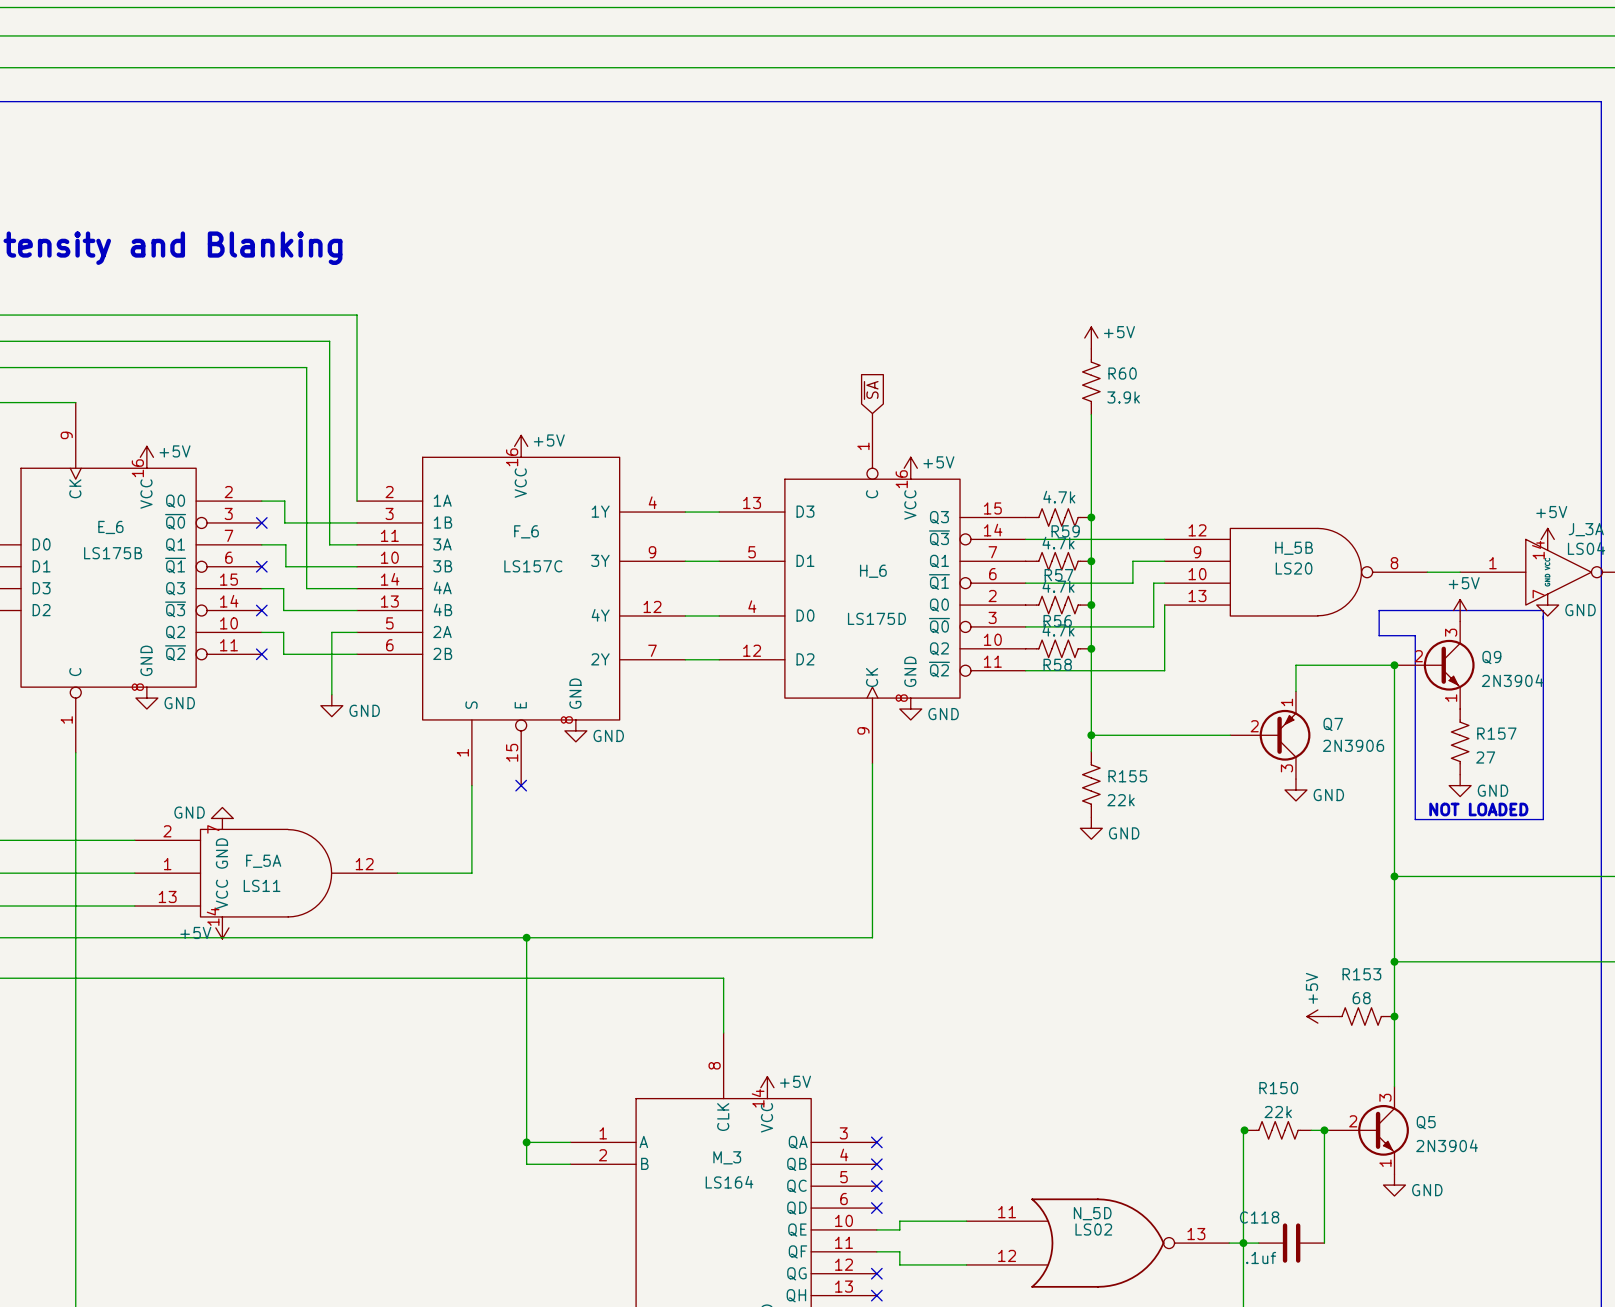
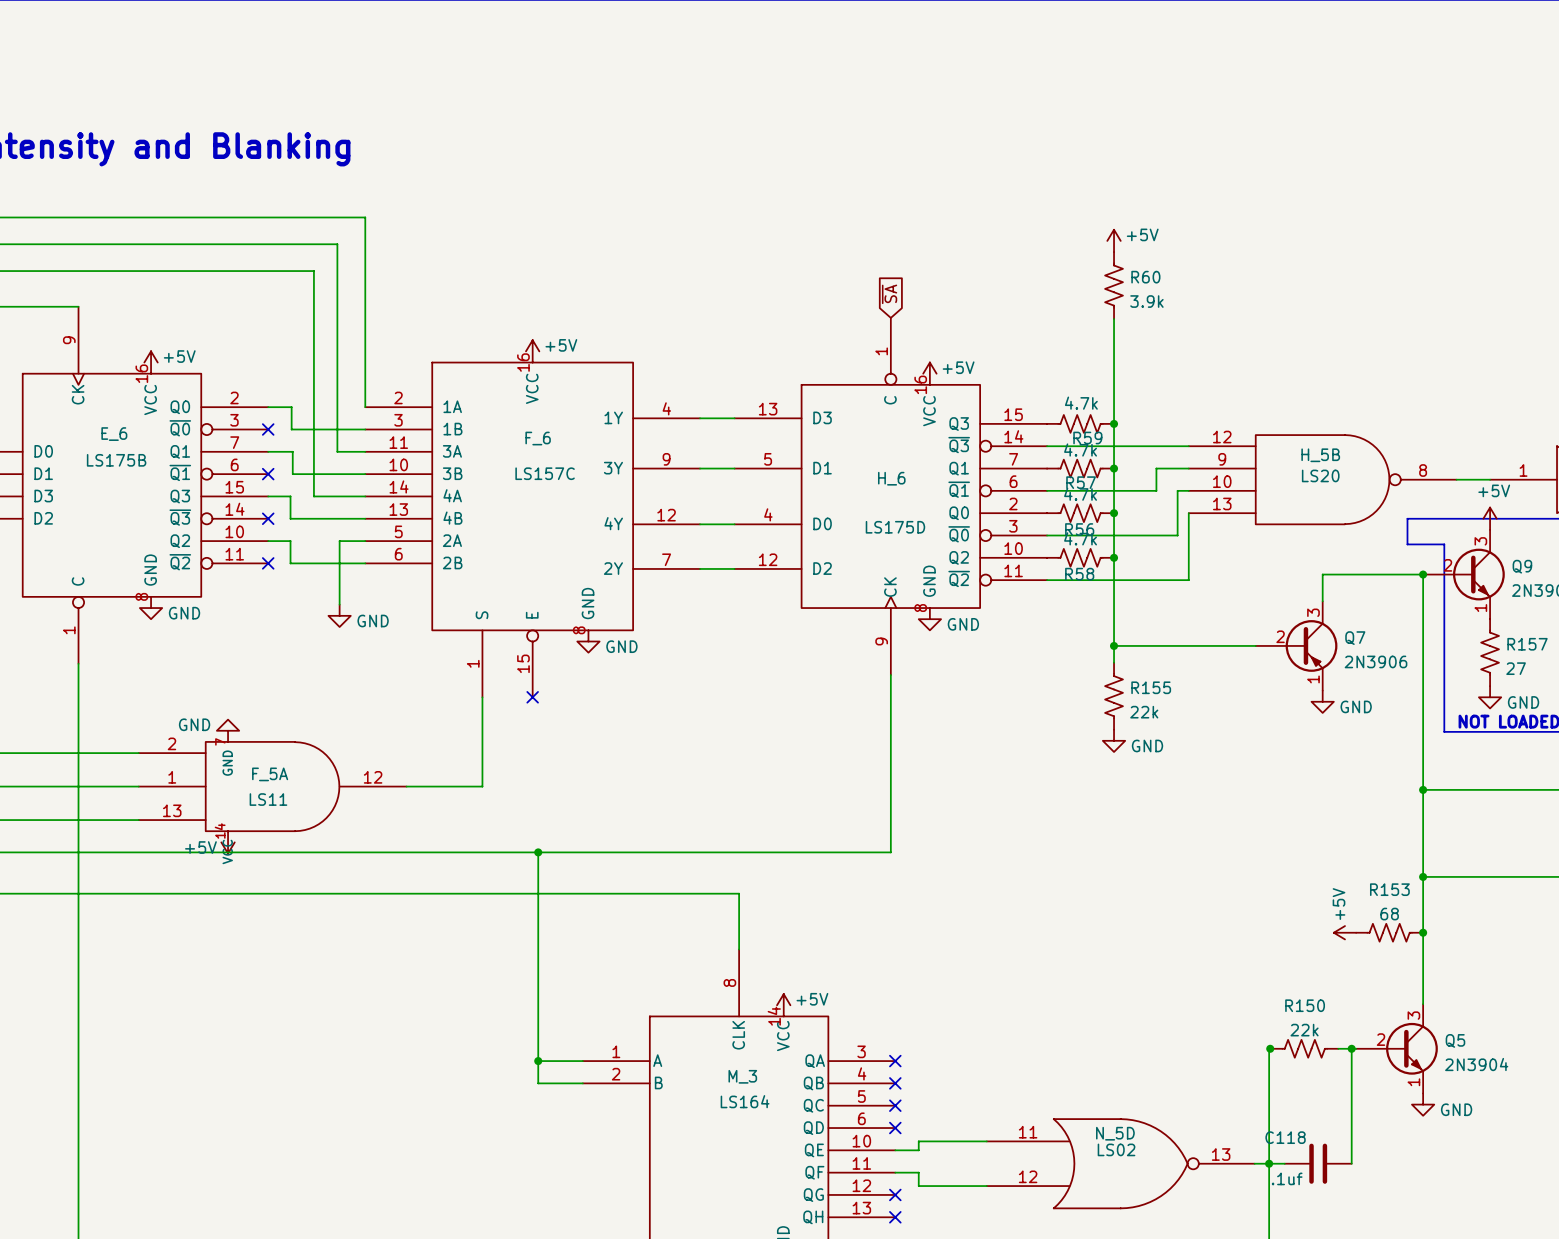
Q7 flip: as is (1285, 735) -> up-down (1311, 645)
F_5A symbol: [134, 829, 398, 917] -> [138, 741, 407, 832]

